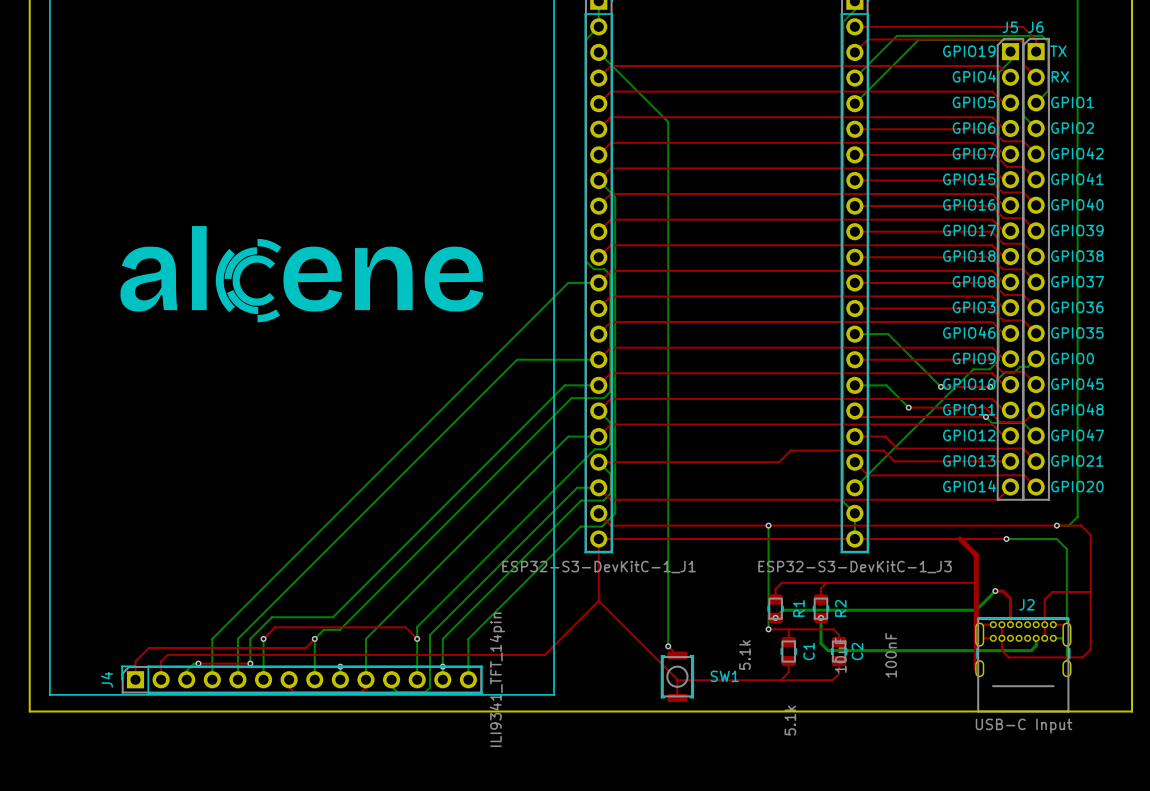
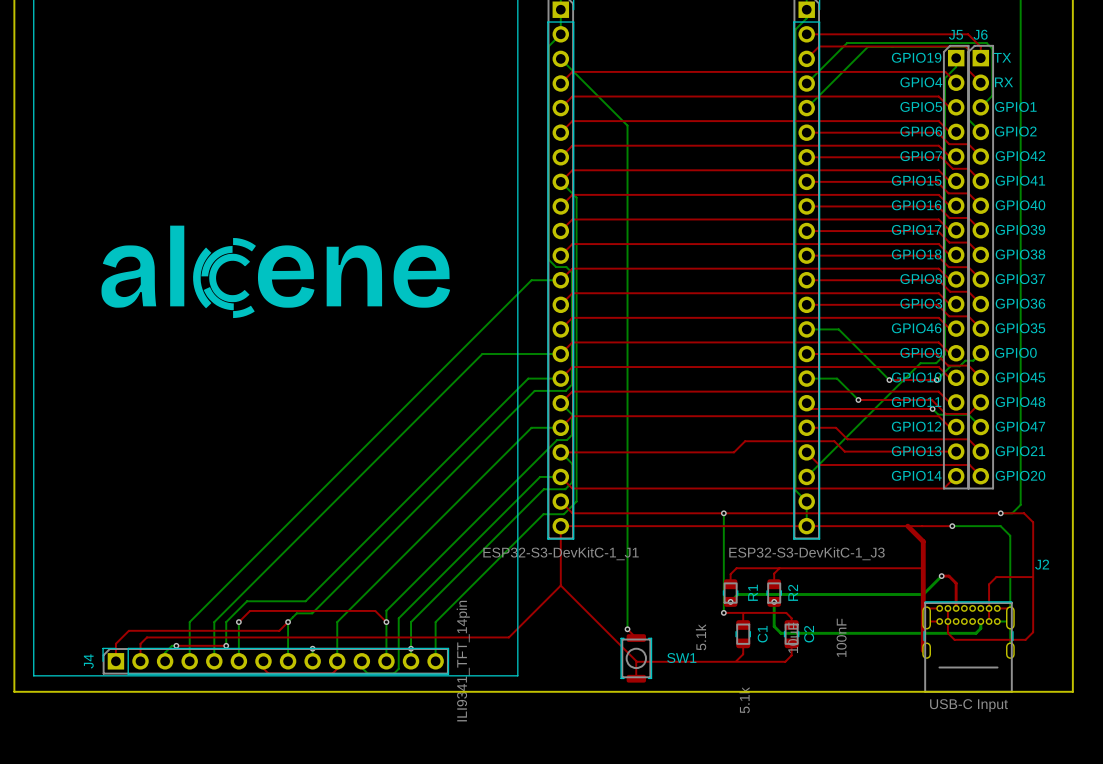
J2 name position: J2 (1026, 604) -> J2 (1042, 564)

